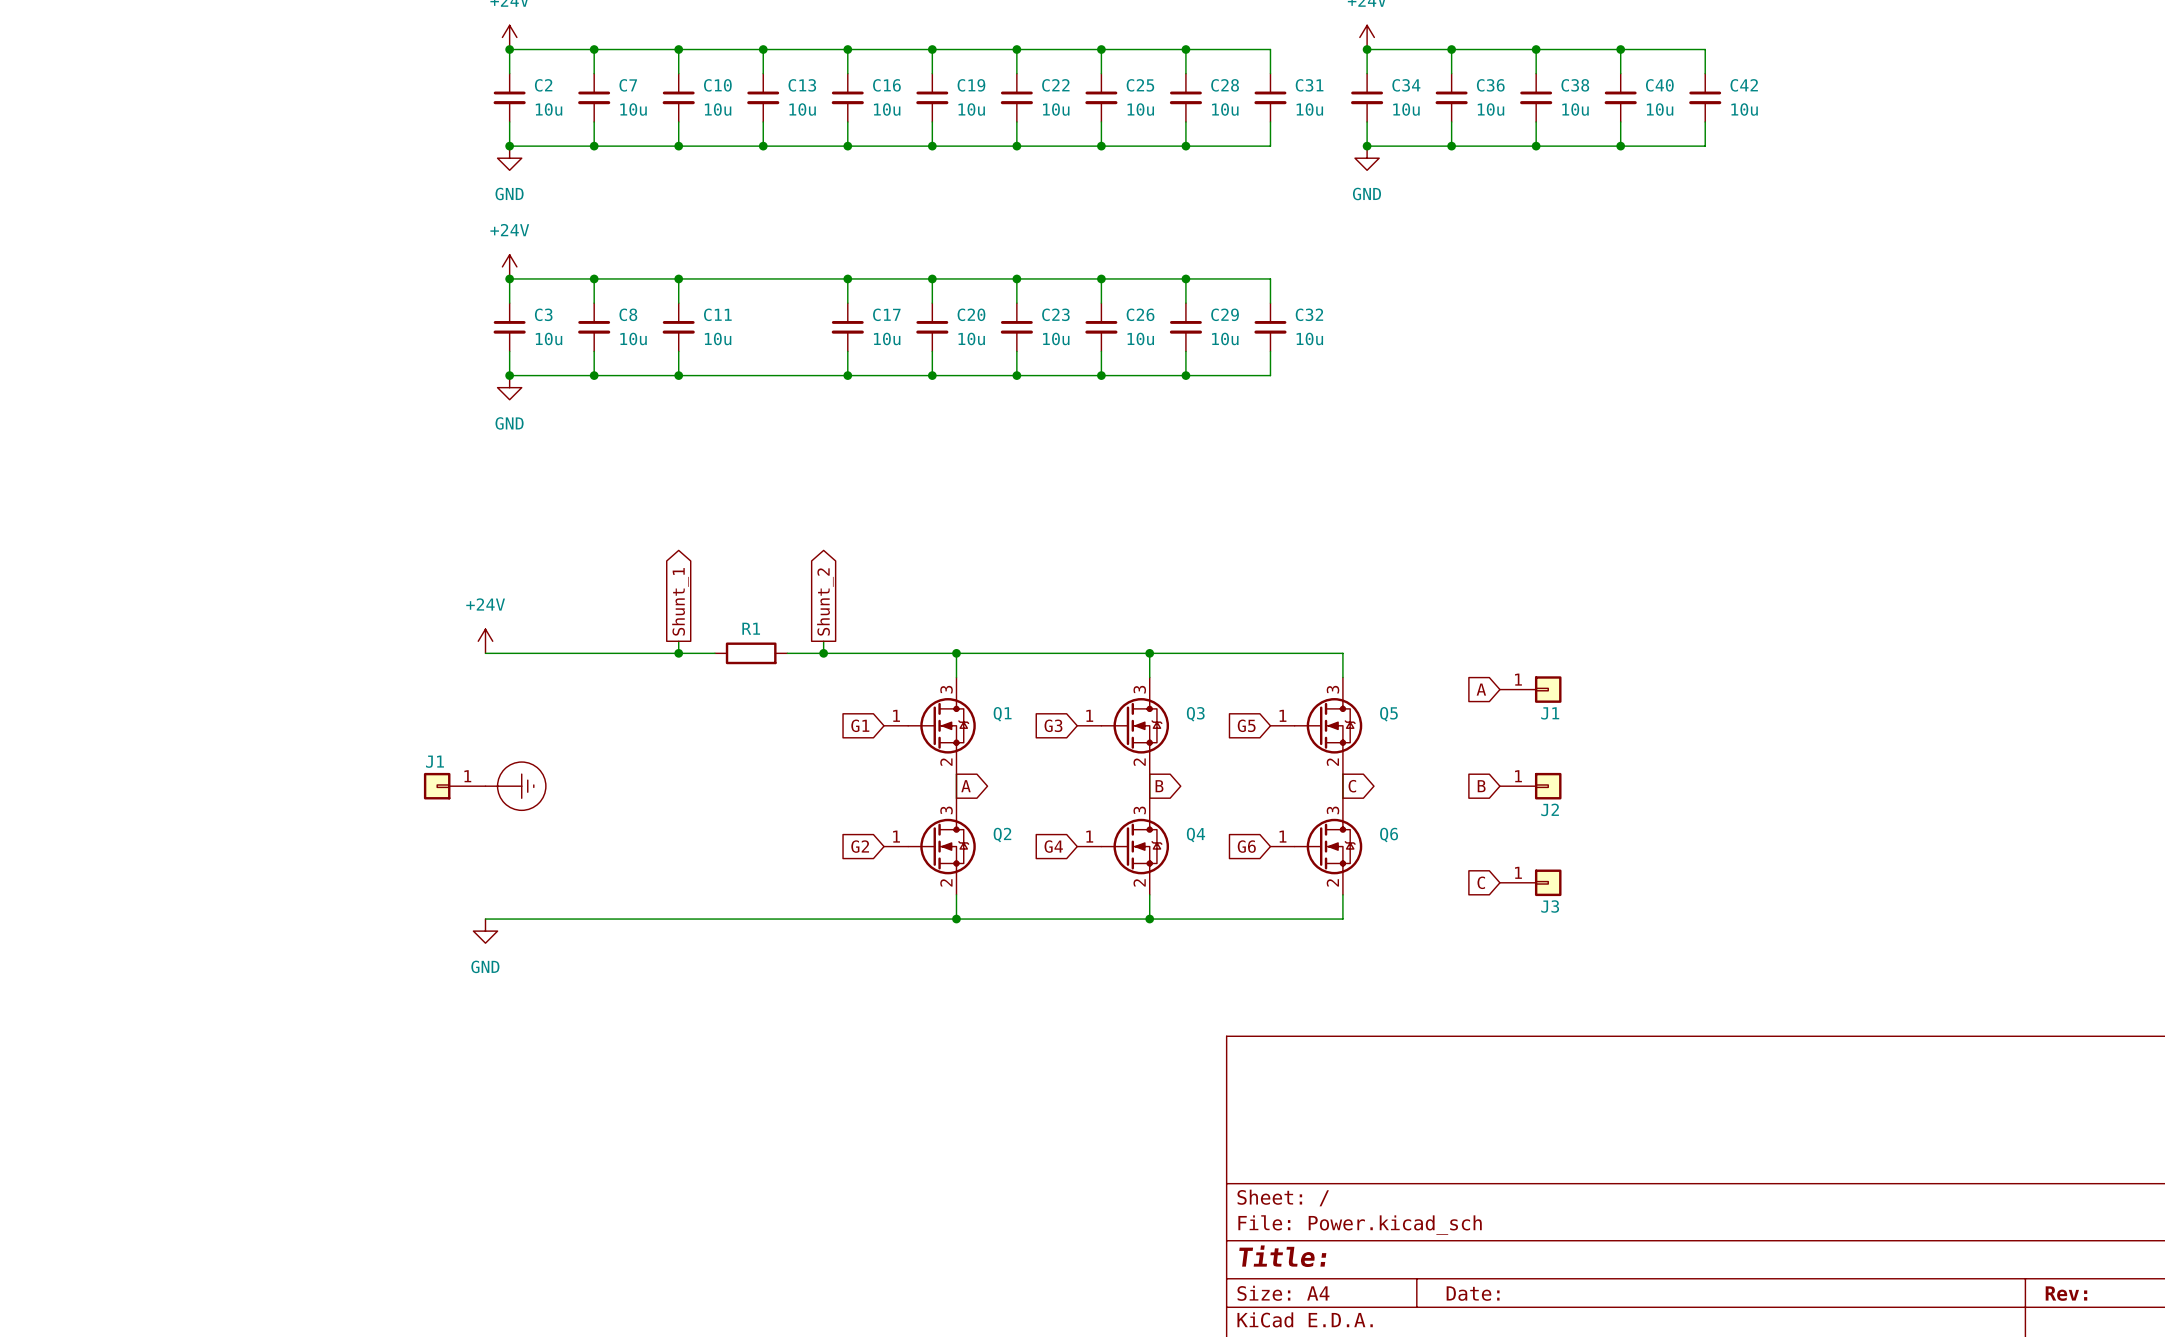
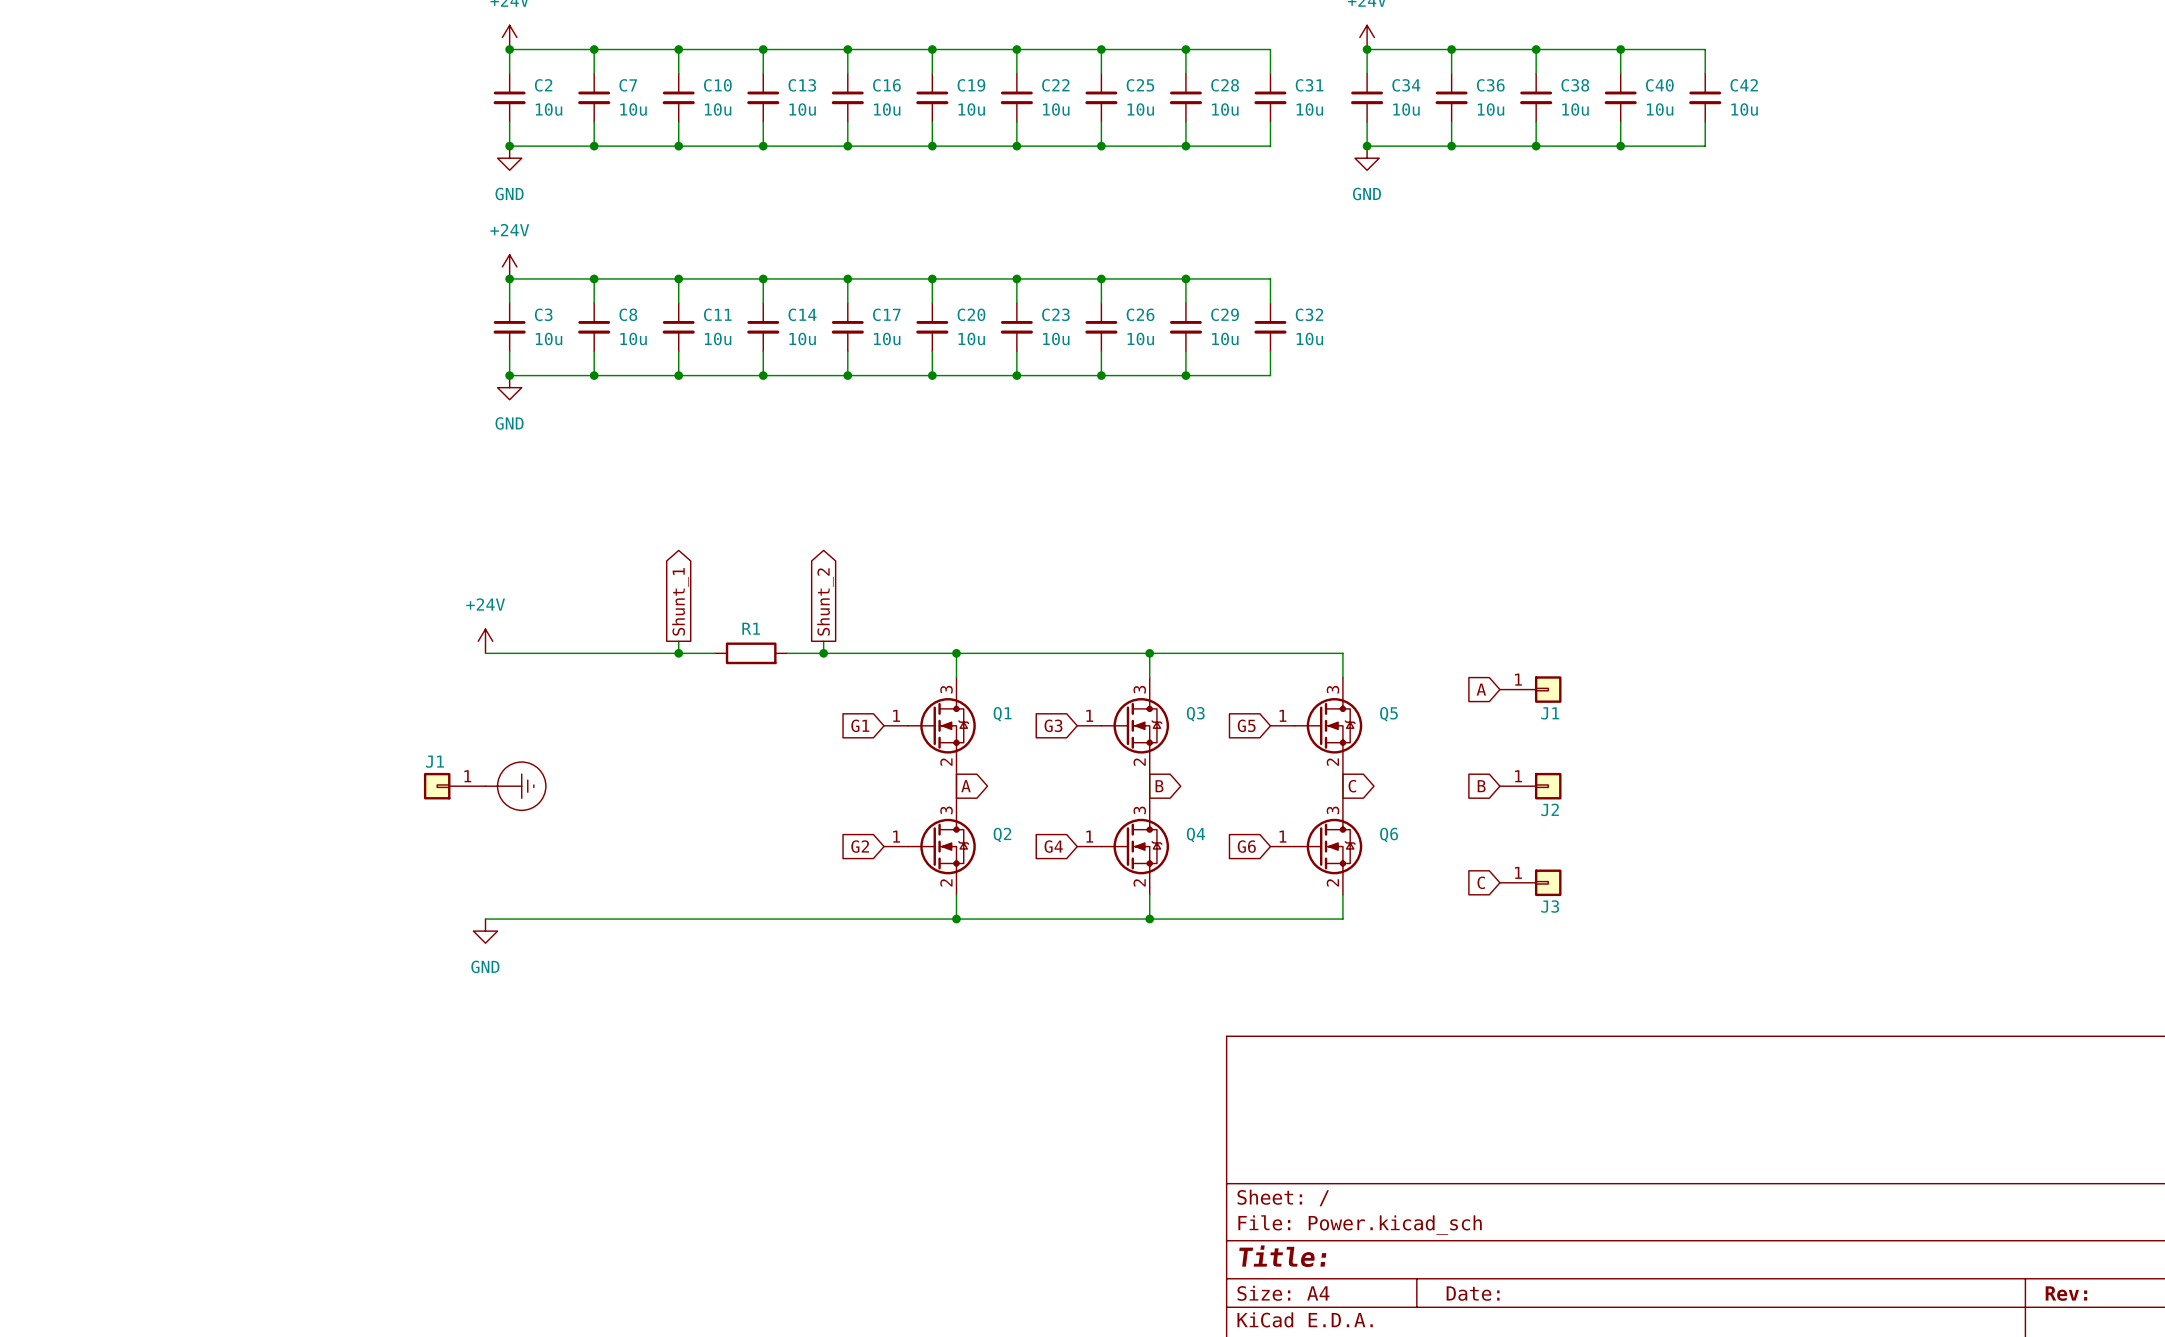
wire: none -> (763, 278) (763, 303)
junction: none -> (763, 278)
C14: none -> 10u (763, 327)
wire: none -> (763, 351) (763, 375)
junction: none -> (763, 375)

